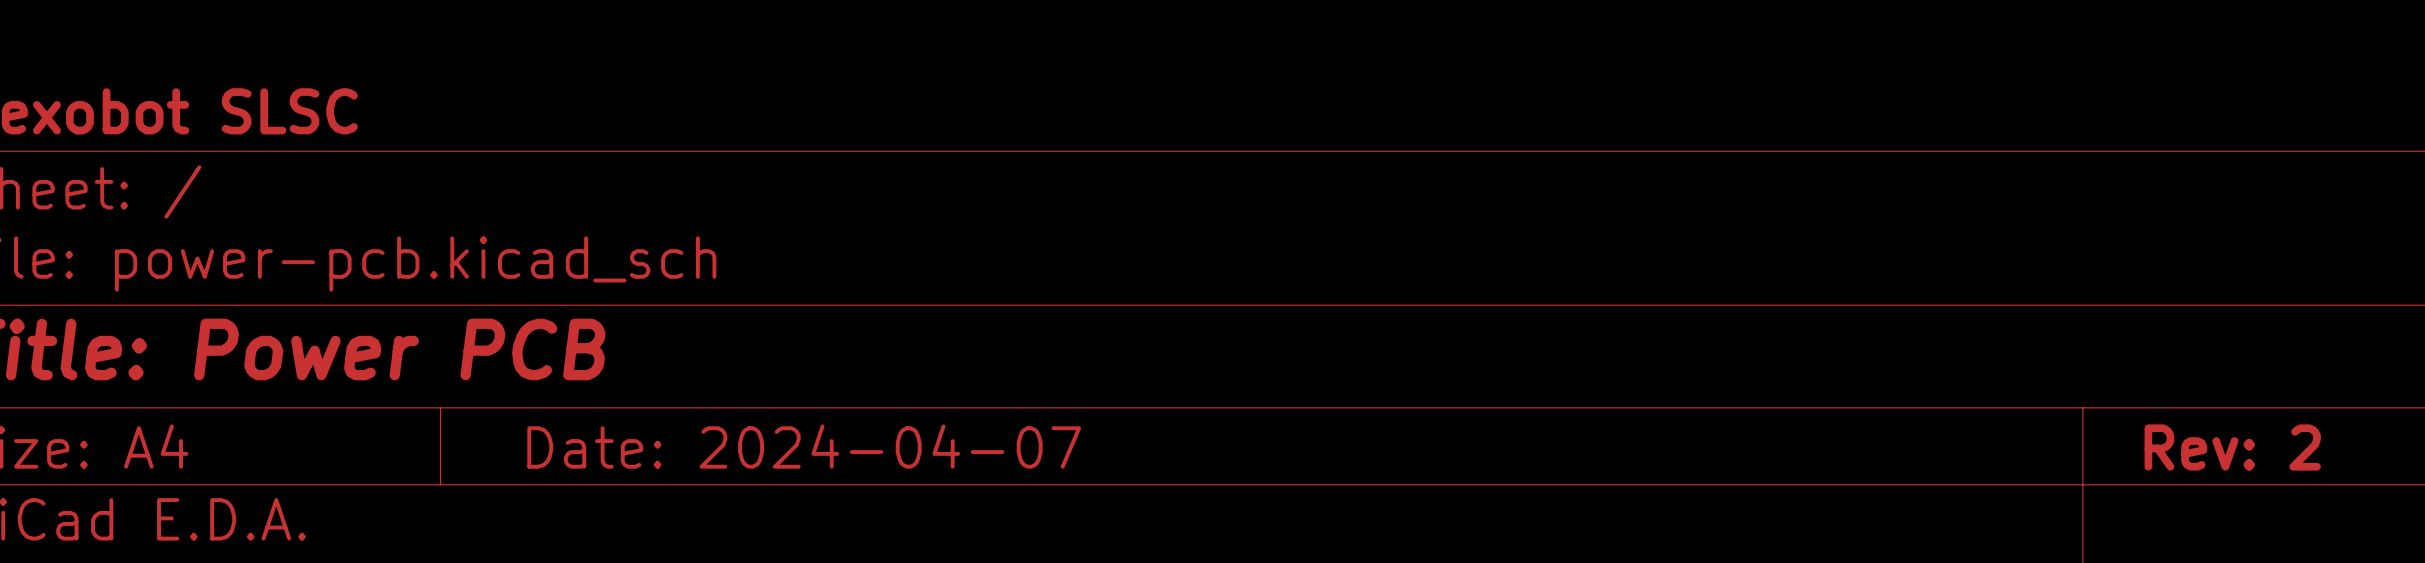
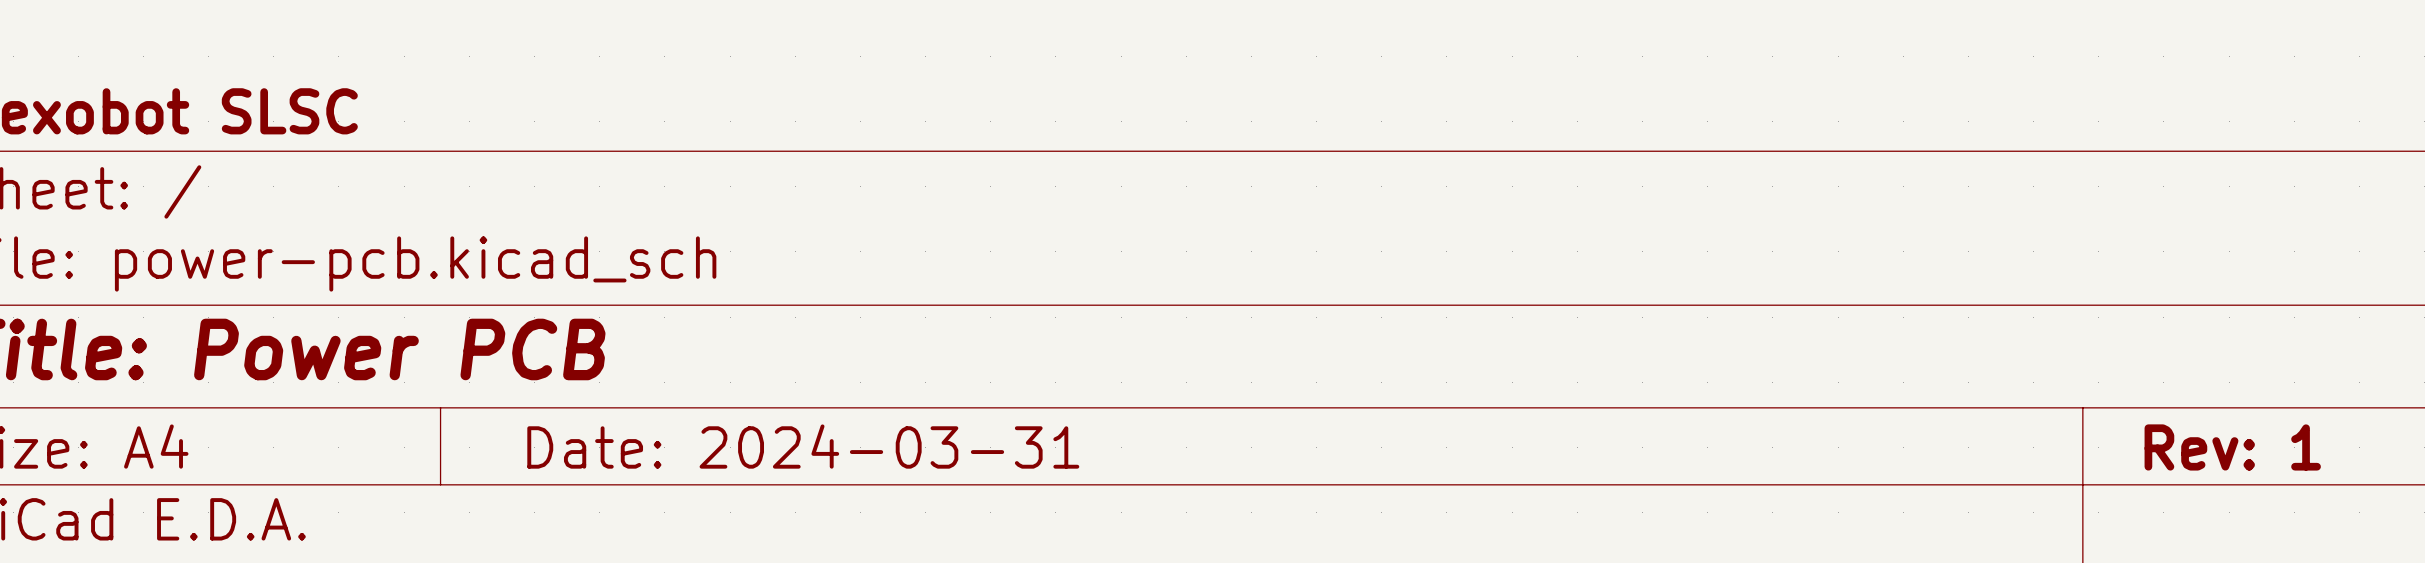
title block: Date: 2024-04-07 (804, 446) -> Date: 2024-03-31 (803, 446)
title block: Rev: 2 (2232, 447) -> Rev: 1 (2232, 447)

